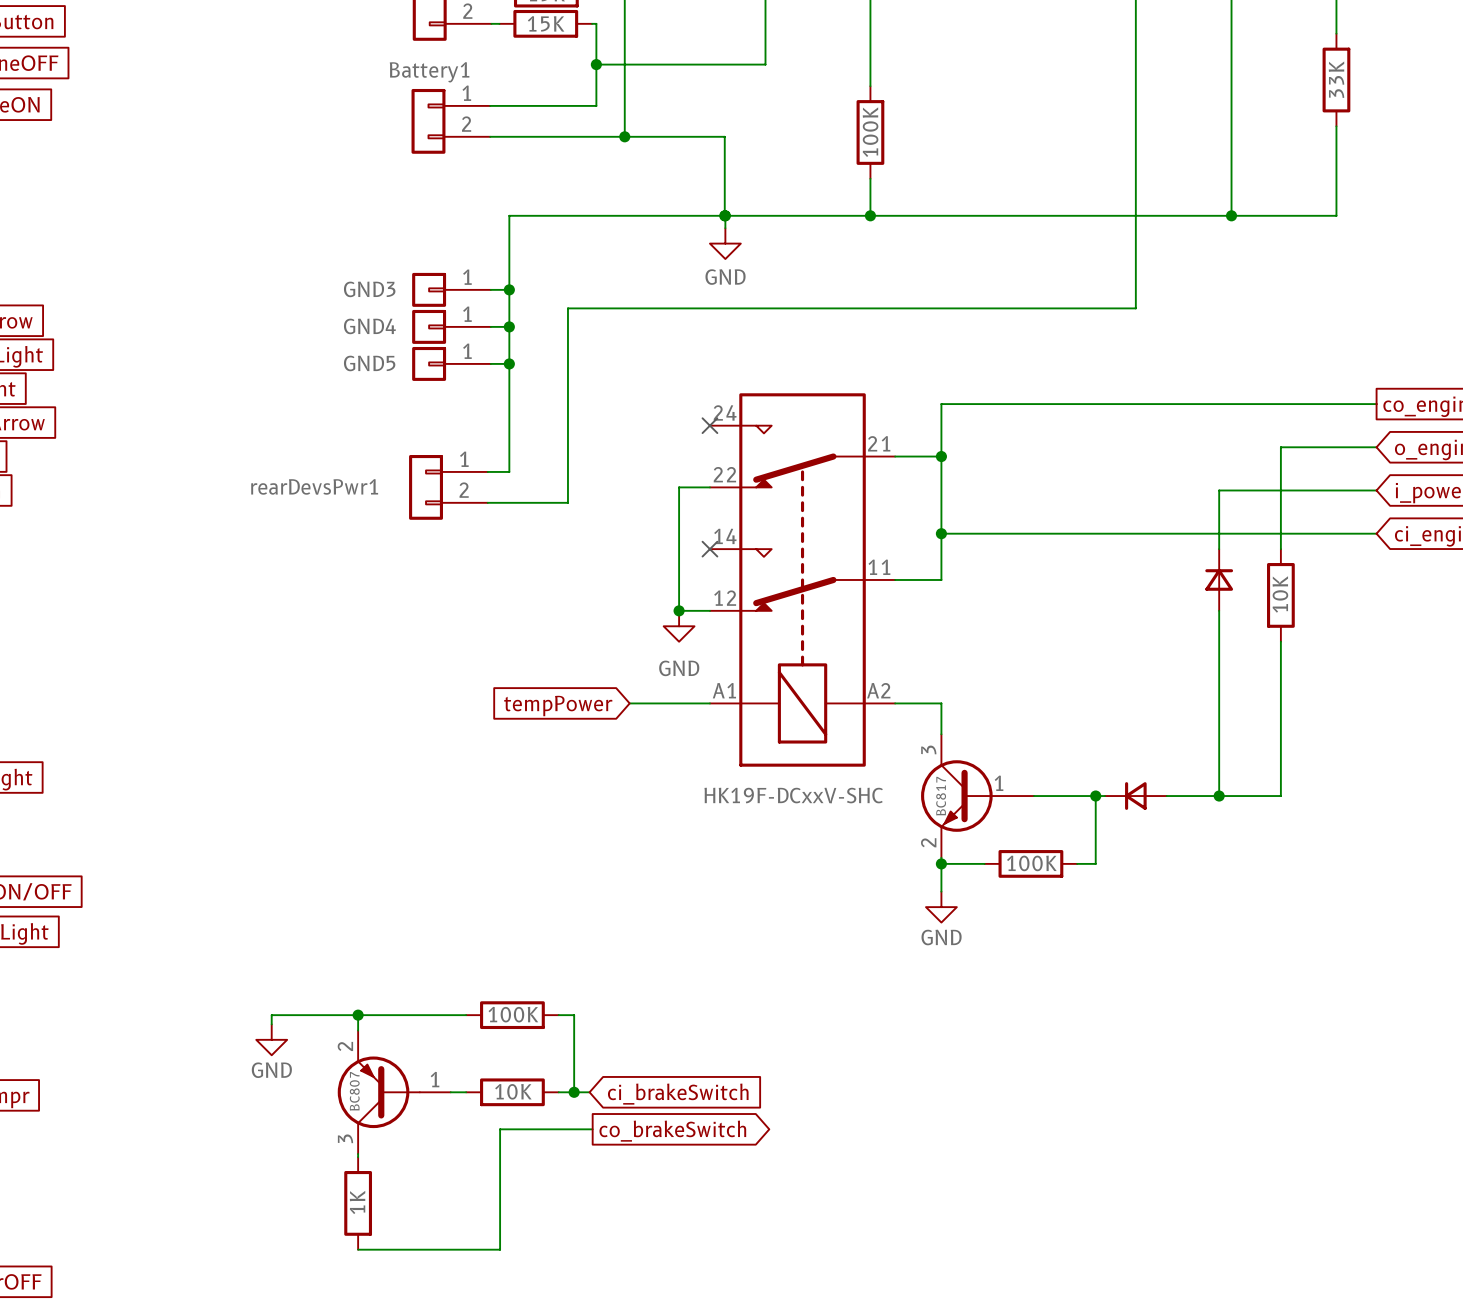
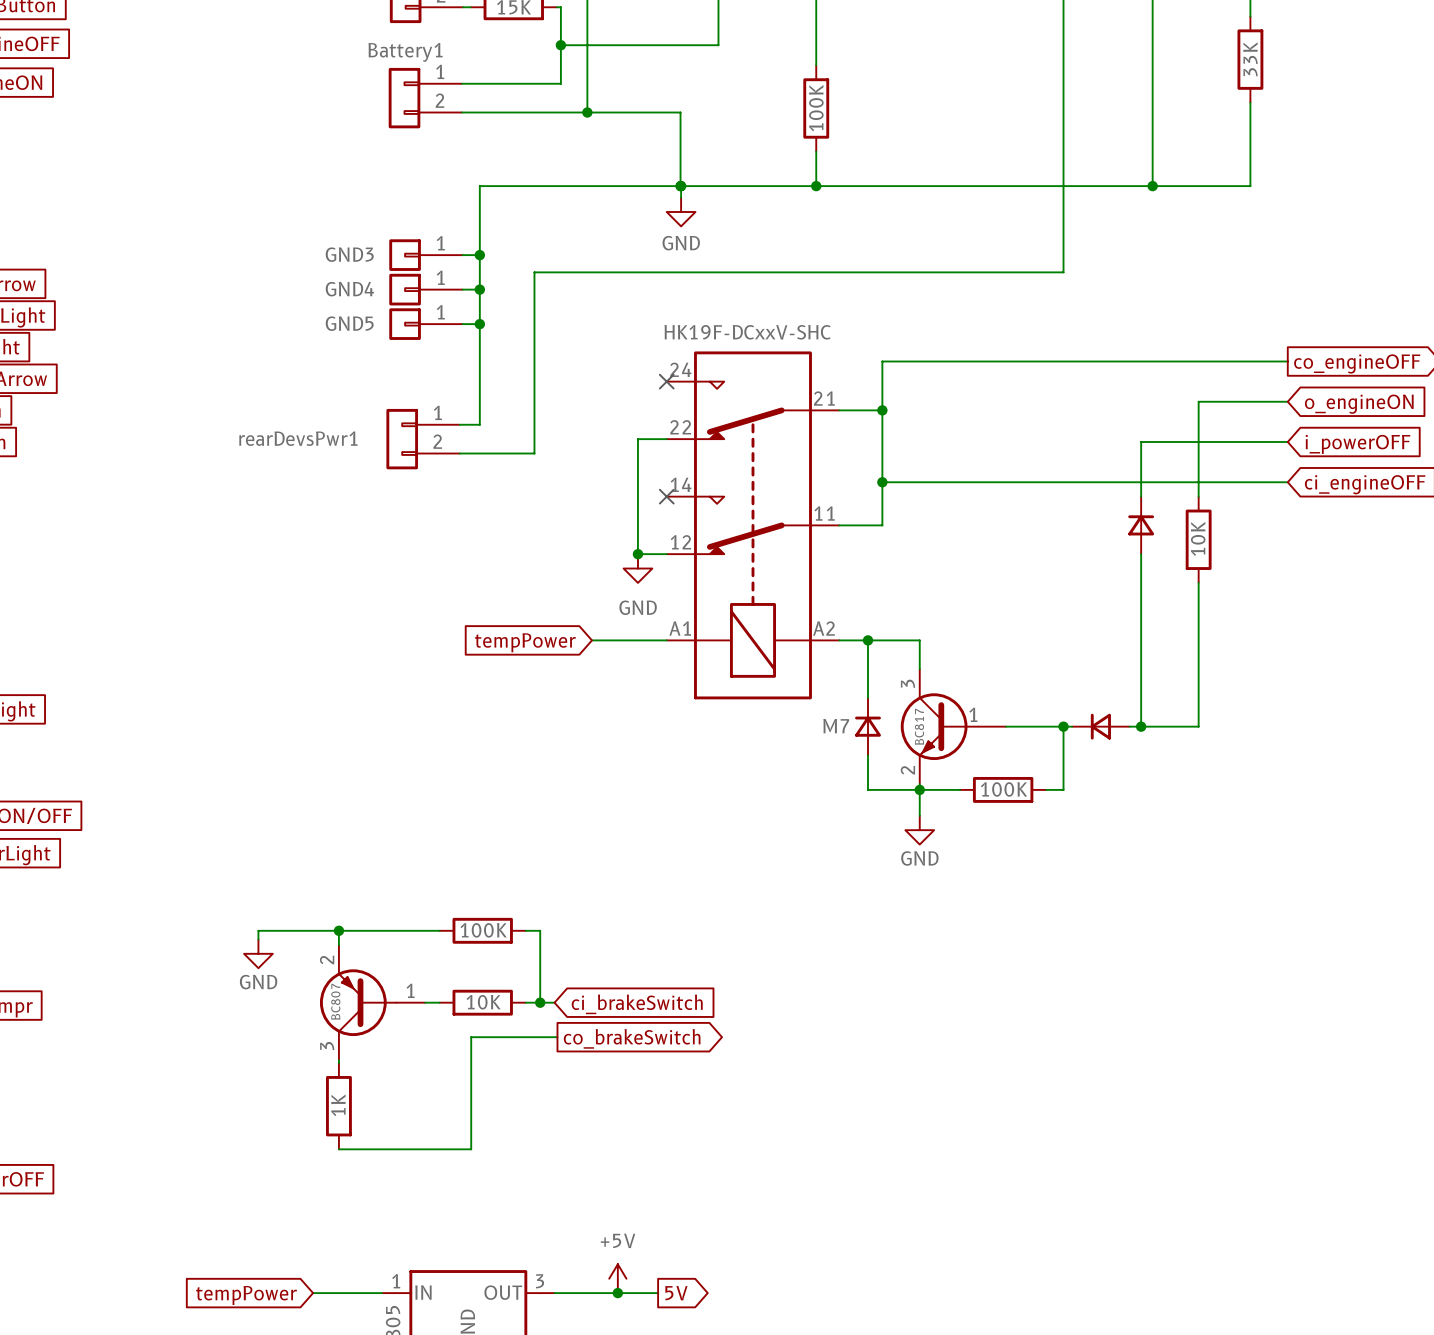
wire: none -> (867, 640) (867, 697)
junction: none -> (867, 640)
wire: (941, 703) (941, 734) -> (882, 640) (919, 640) (919, 669)
part value position: HK19F-DCxxV-SHC (793, 795) -> HK19F-DCxxV-SHC (747, 332)
part: none -> M7 (867, 726)
part position: (977, 796) -> (953, 726)
wire: (1095, 796) (1095, 863) (1077, 863) -> (1063, 726) (1063, 789) (1046, 789)
junction position: (1095, 796) -> (1063, 726)
part position: (1135, 796) -> (1100, 726)
wire: none -> (867, 755) (867, 789) (882, 789)
wire: (941, 857) (941, 891) -> (919, 784) (919, 815)
junction position: (941, 863) -> (919, 789)
part position: (1030, 863) -> (1003, 789)
power symbol position: GND (941, 907) -> GND (919, 830)

